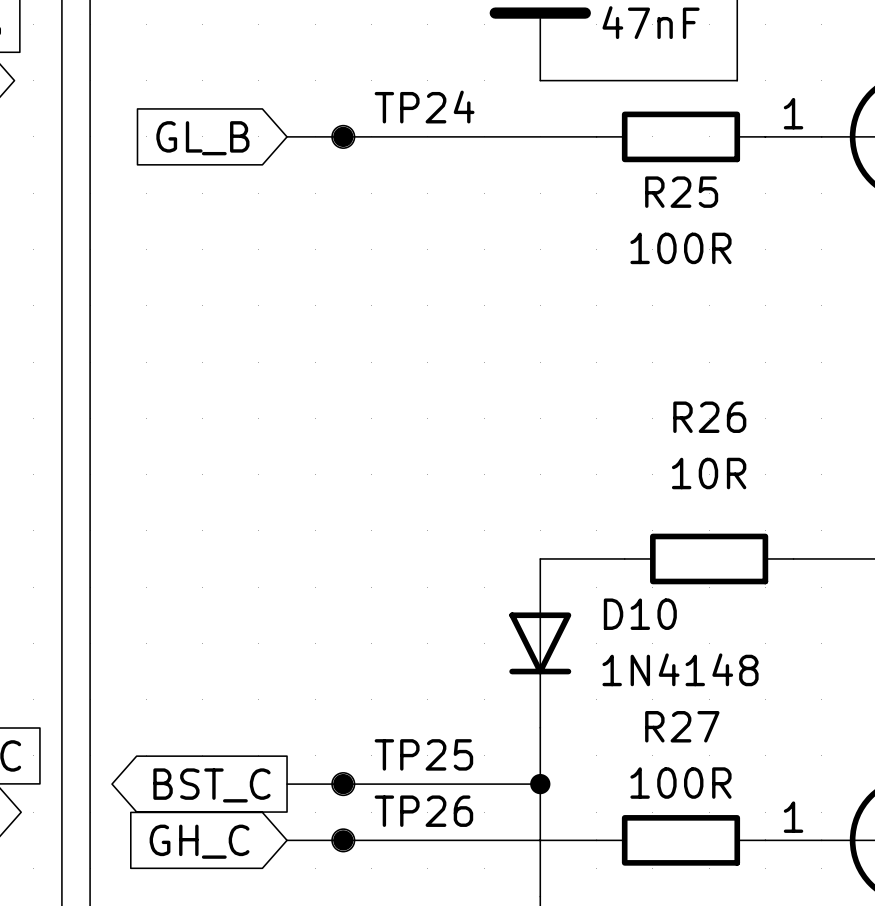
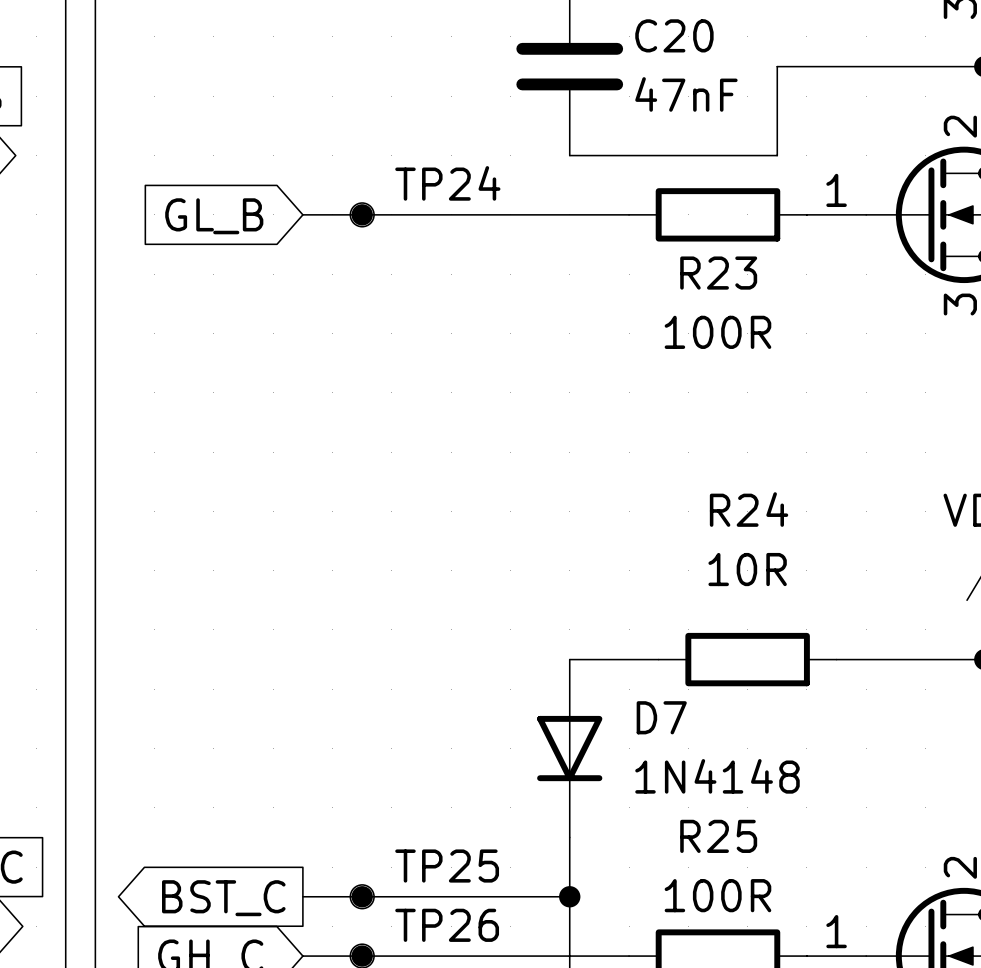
R25 name: R25 (681, 192) -> R23 (718, 273)
R26 name: R26 (709, 417) -> R24 (749, 509)
D10 name: D10 (640, 614) -> D7 (661, 717)
R27 name: R27 (682, 726) -> R25 (718, 836)

